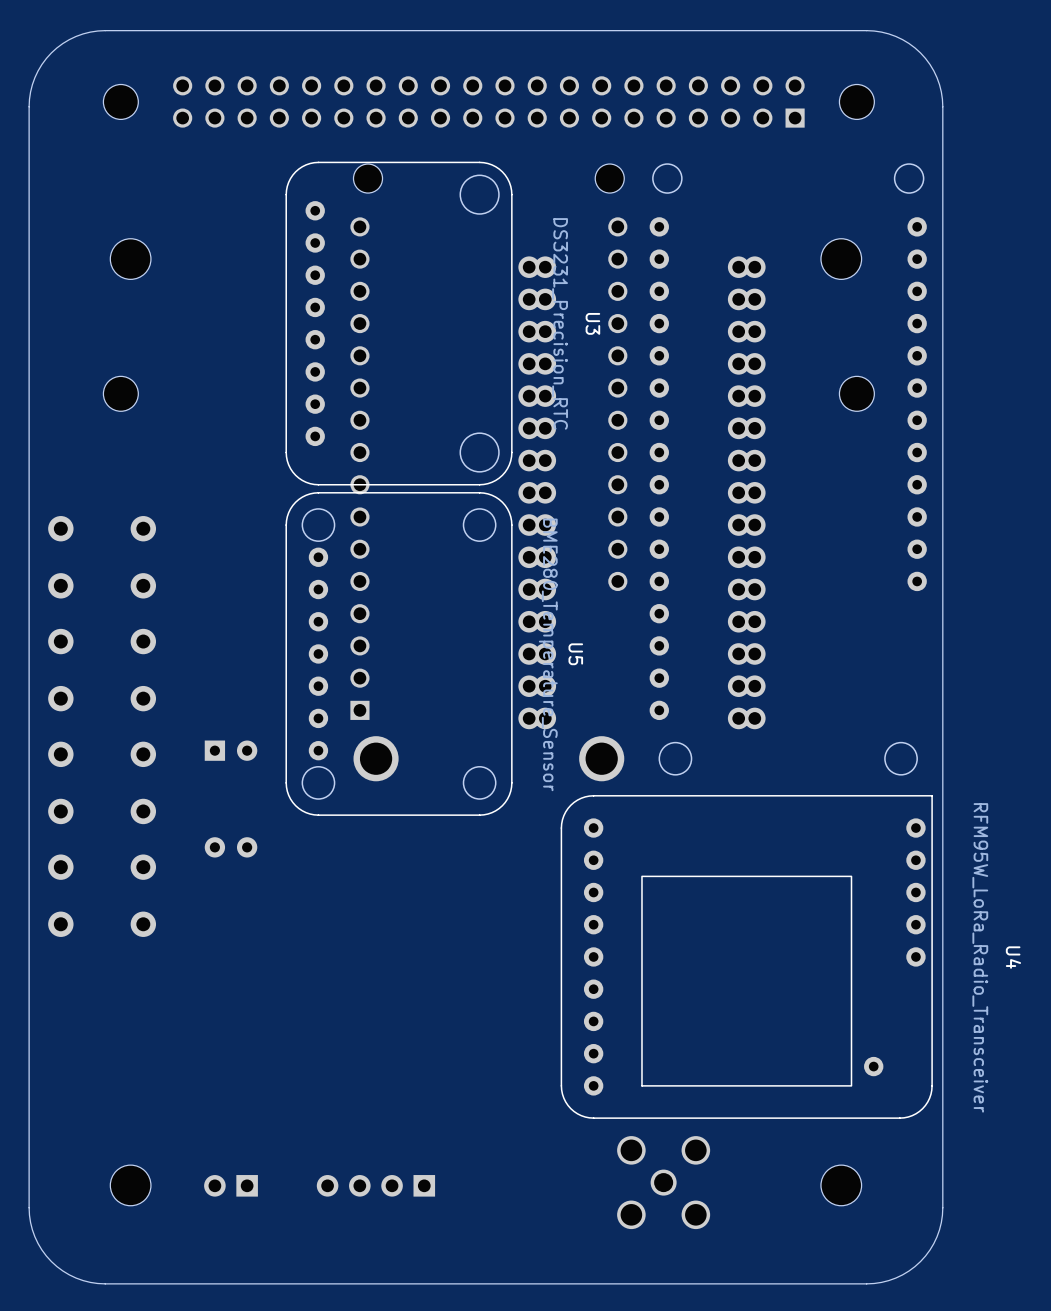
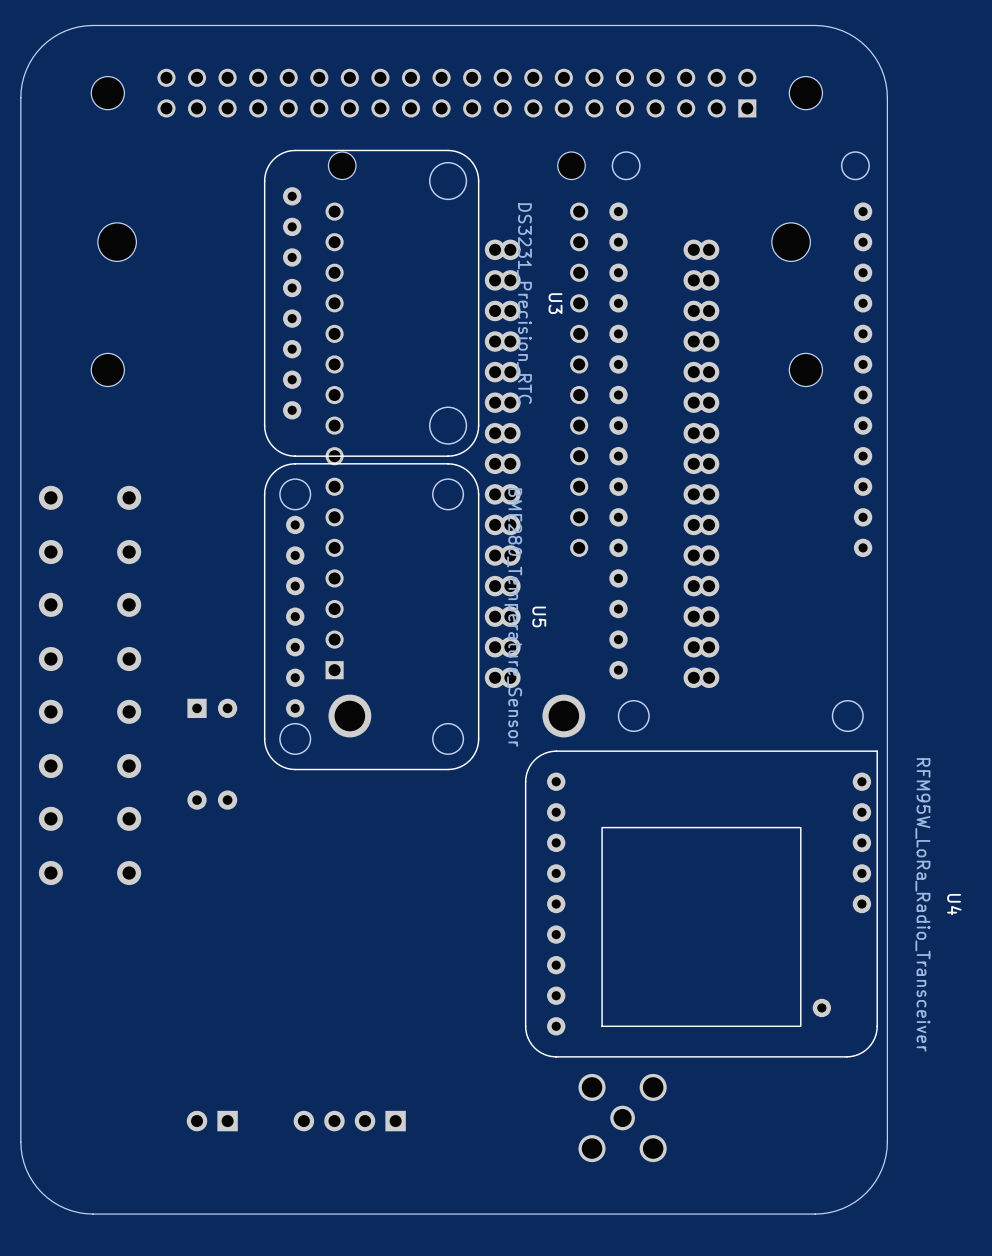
part: (130, 1185) -> none
part: (841, 1185) -> none

